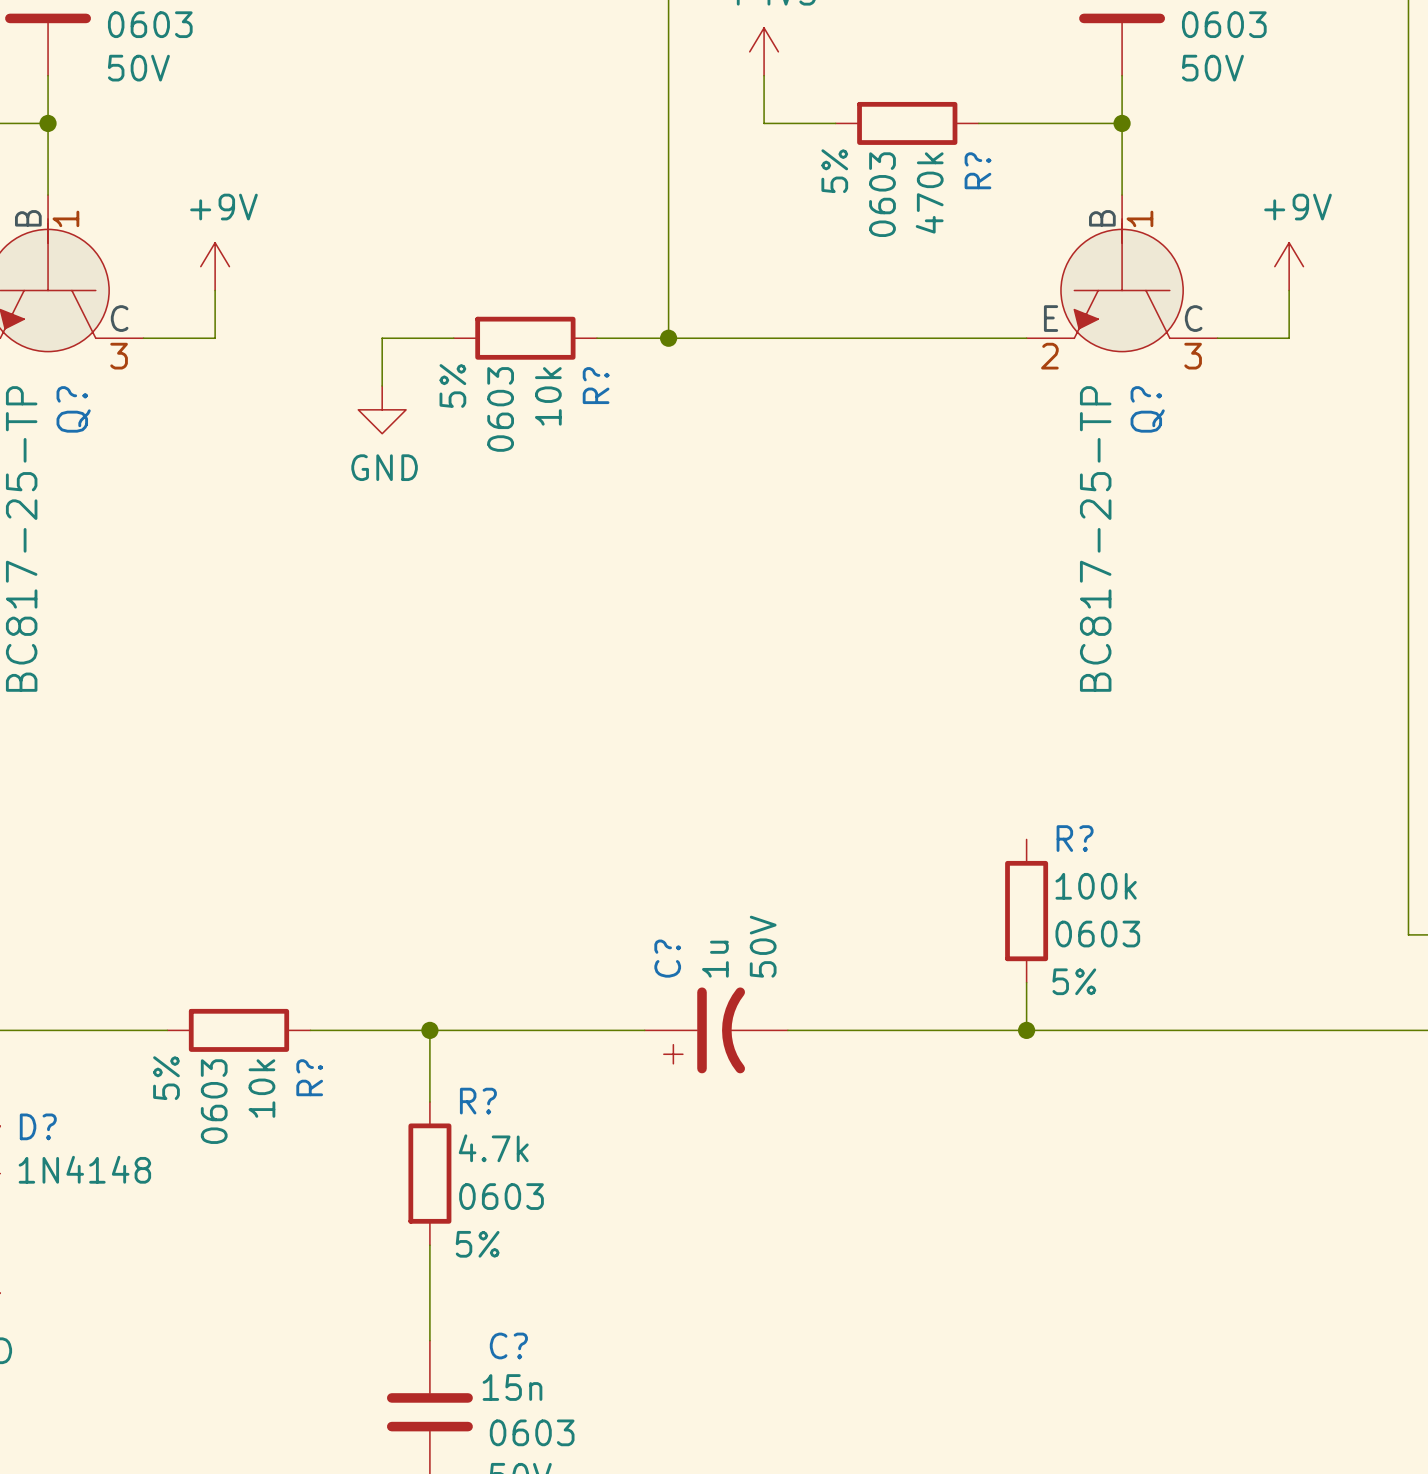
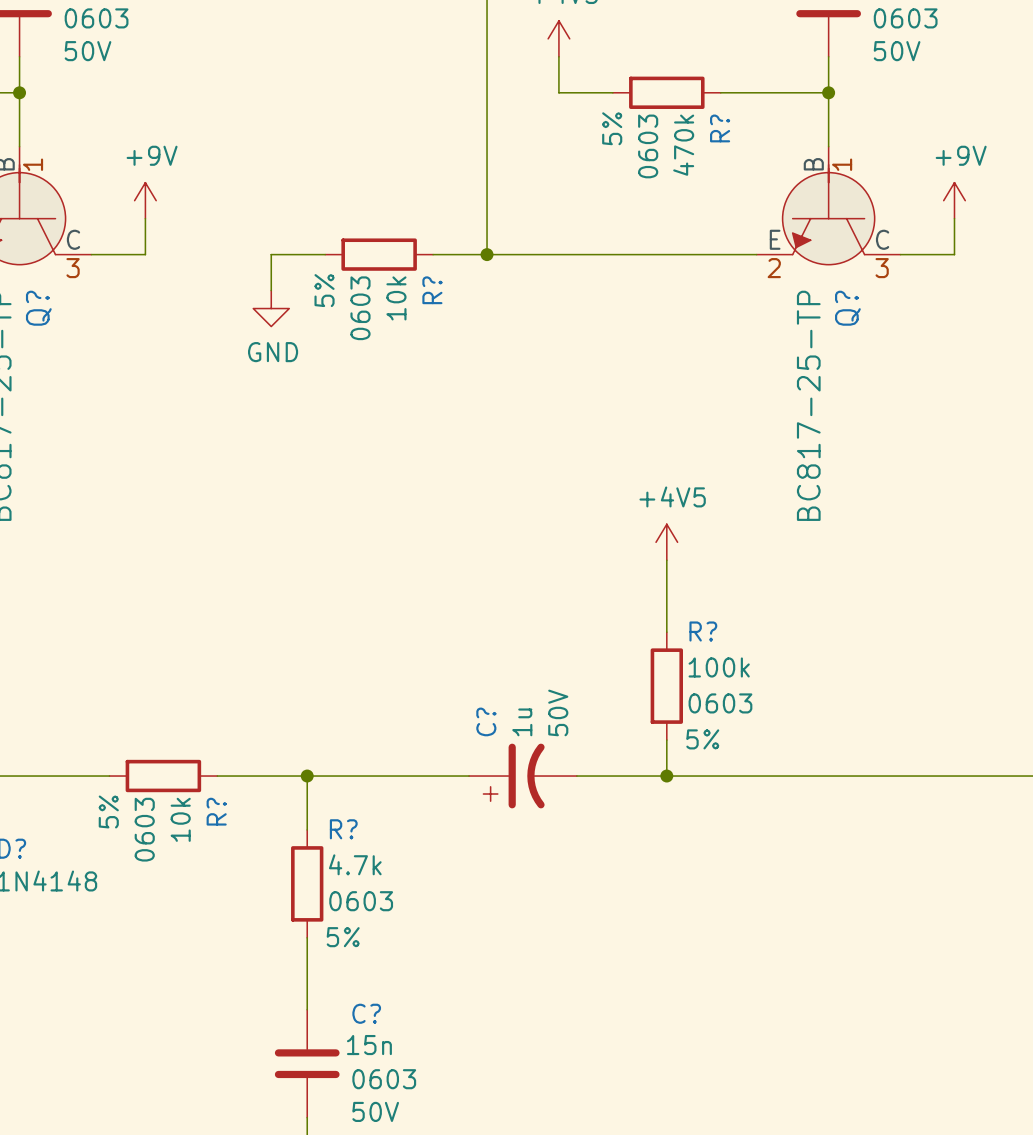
power symbol: none -> +4V5 (666, 542)
wire: none -> (666, 560) (666, 632)
R? position: (1026, 911) -> (666, 686)
wire: (1026, 982) (1026, 1030) -> (666, 740) (666, 776)
junction: none -> (666, 776)
junction: (1026, 1030) -> none

